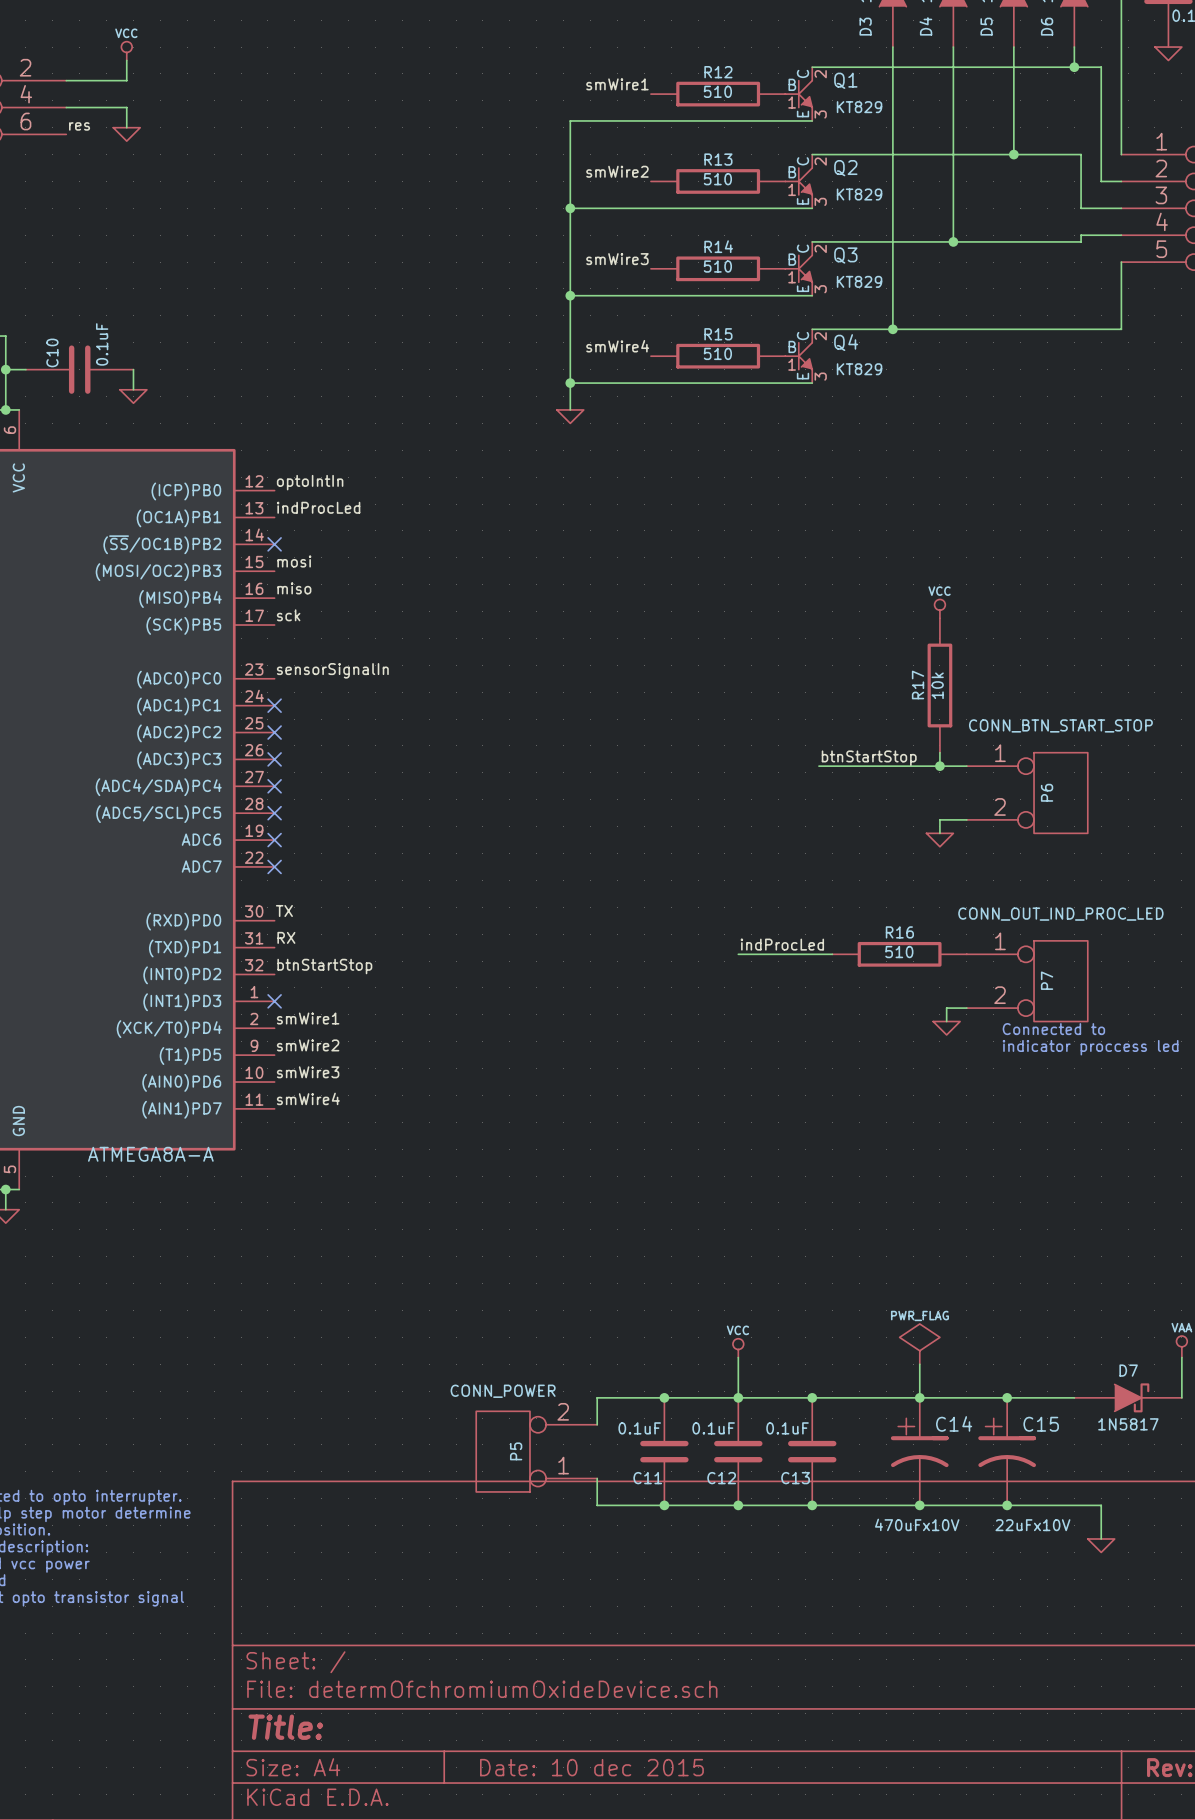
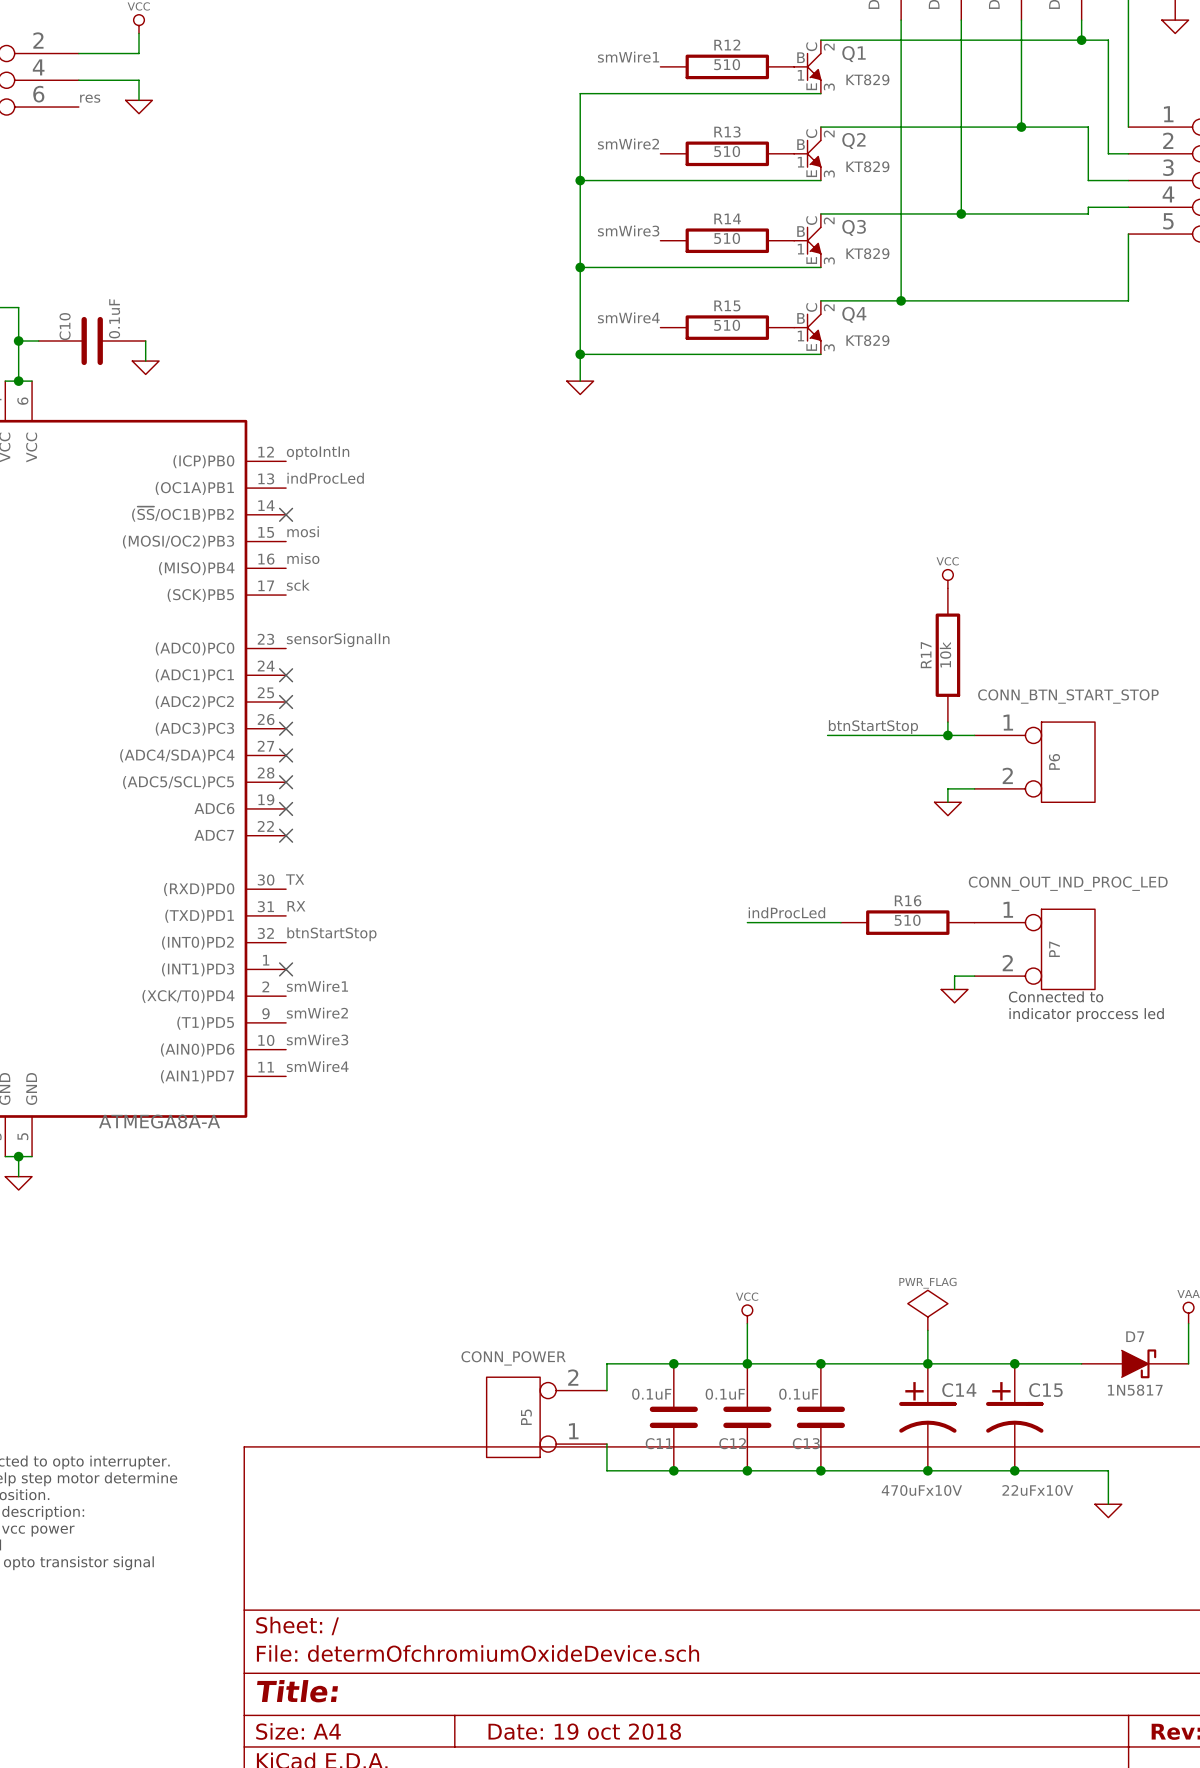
title block: Date: 10 dec 2015 (591, 1767) -> Date: 19 oct 2018 (584, 1731)

